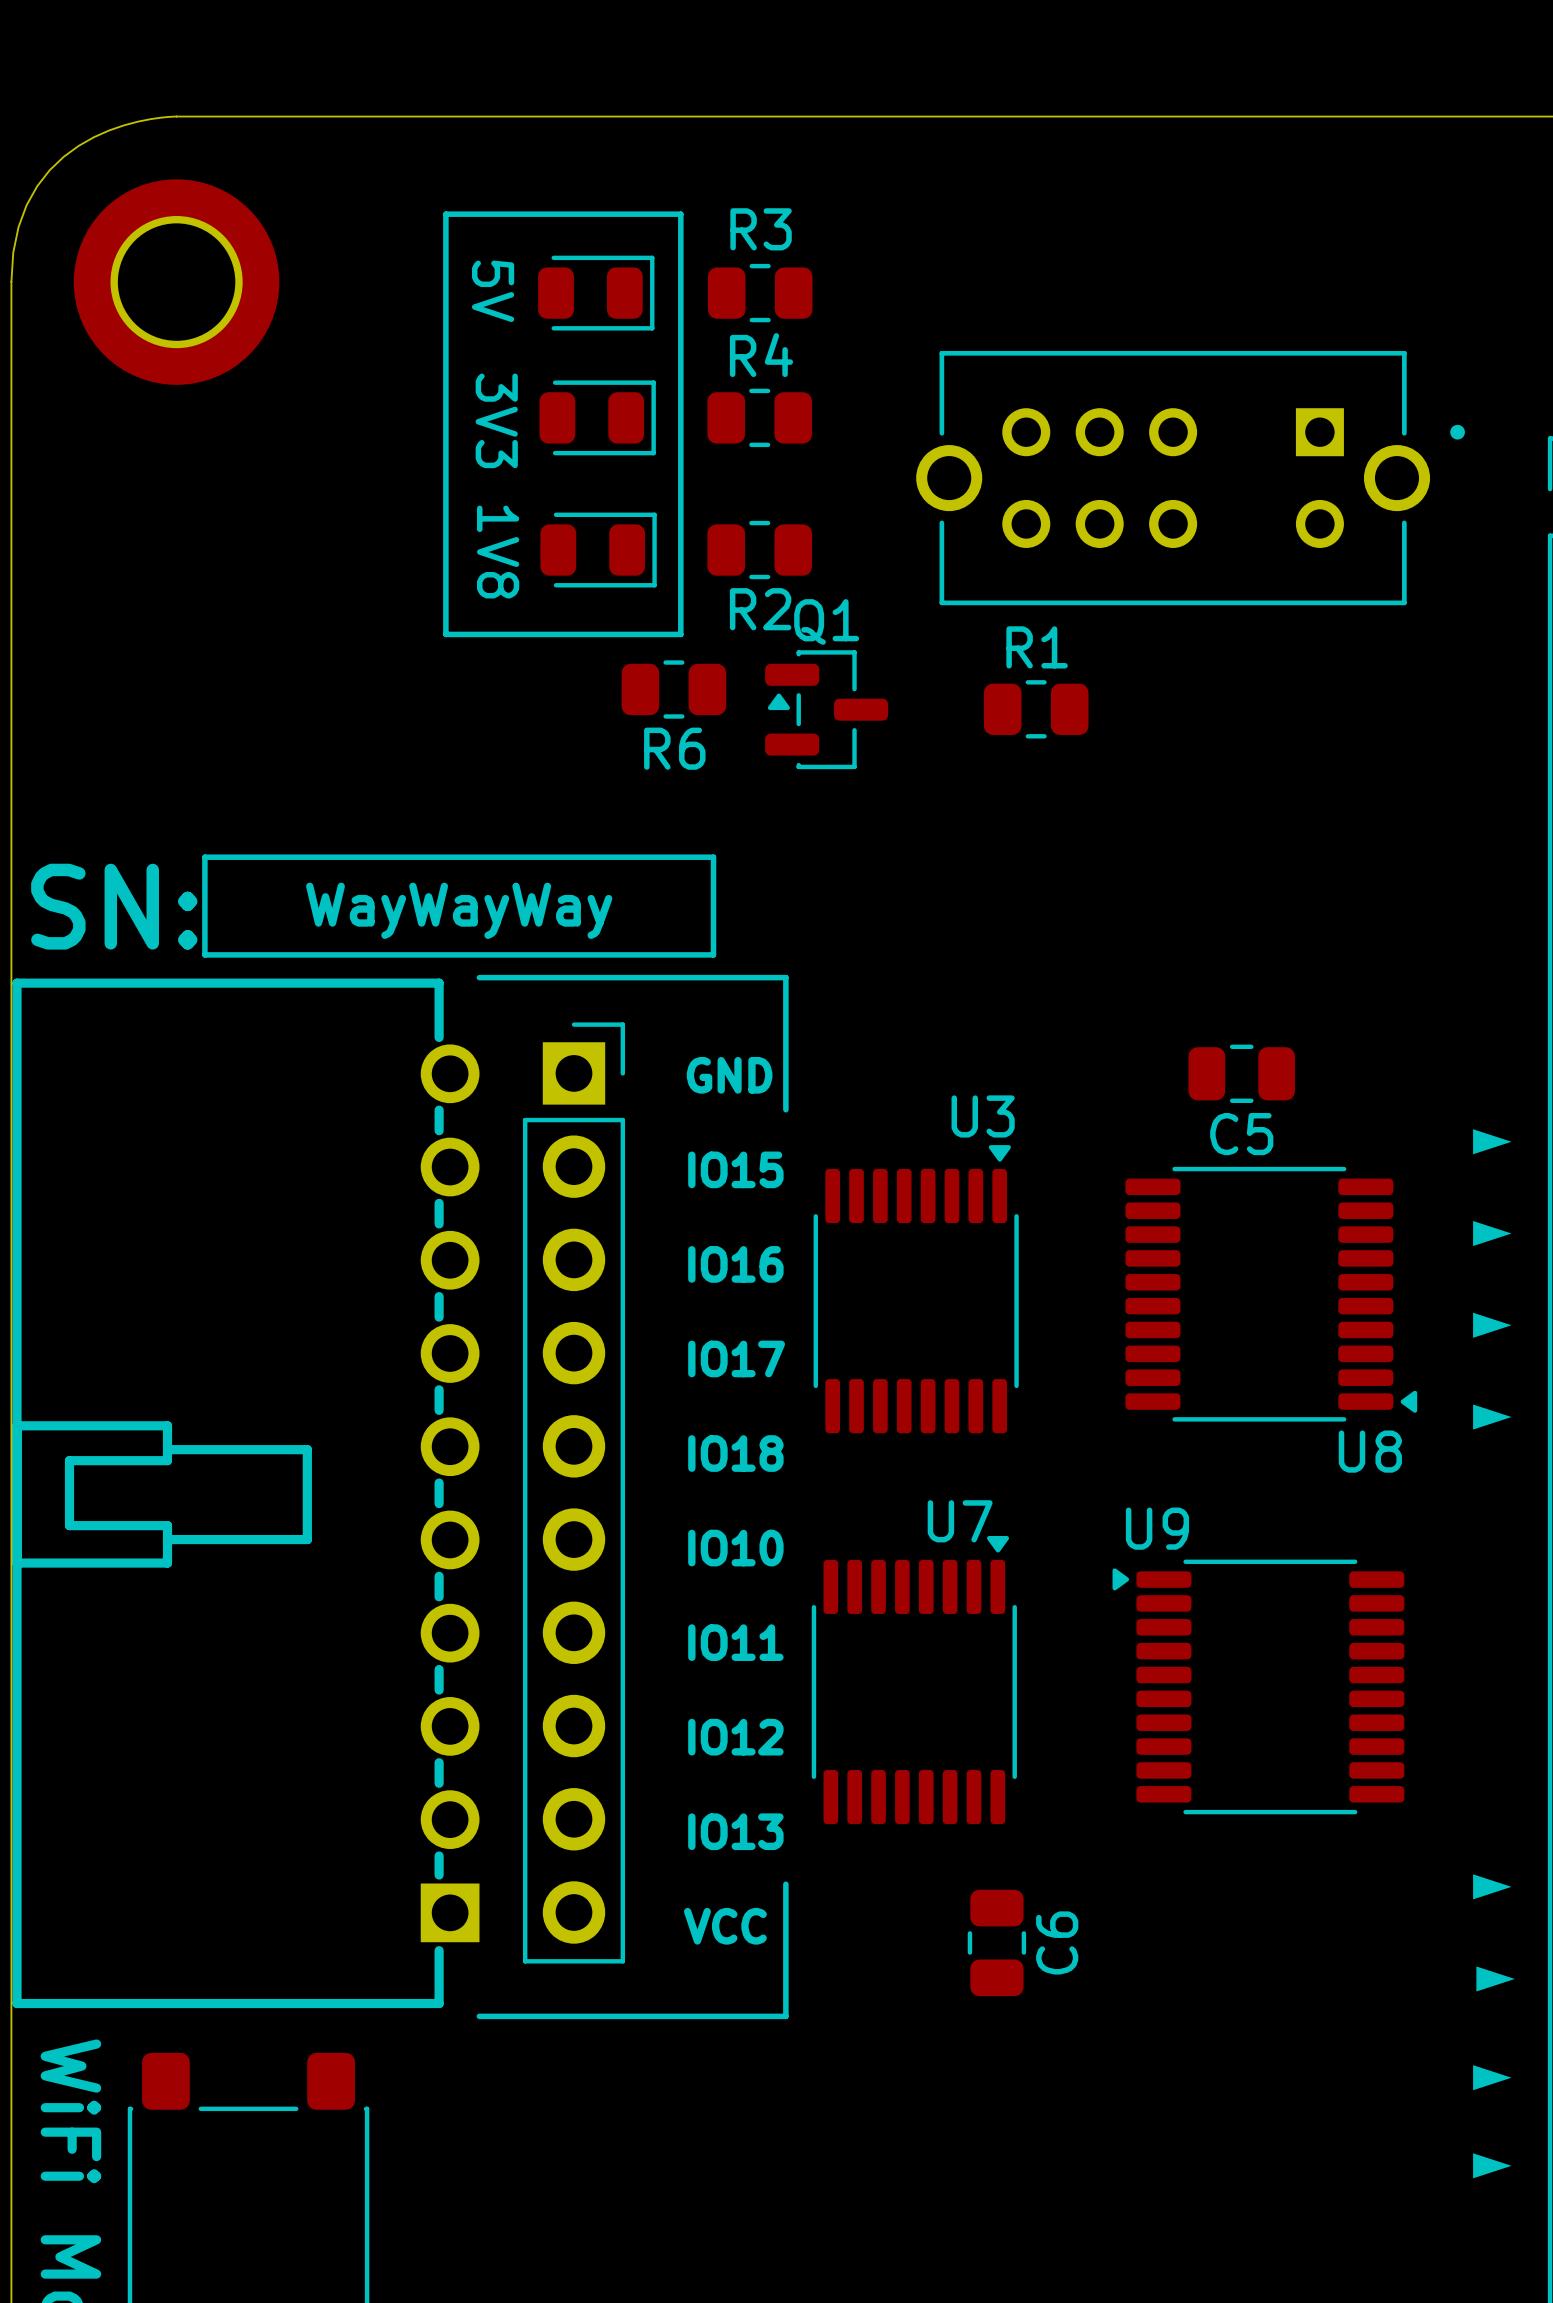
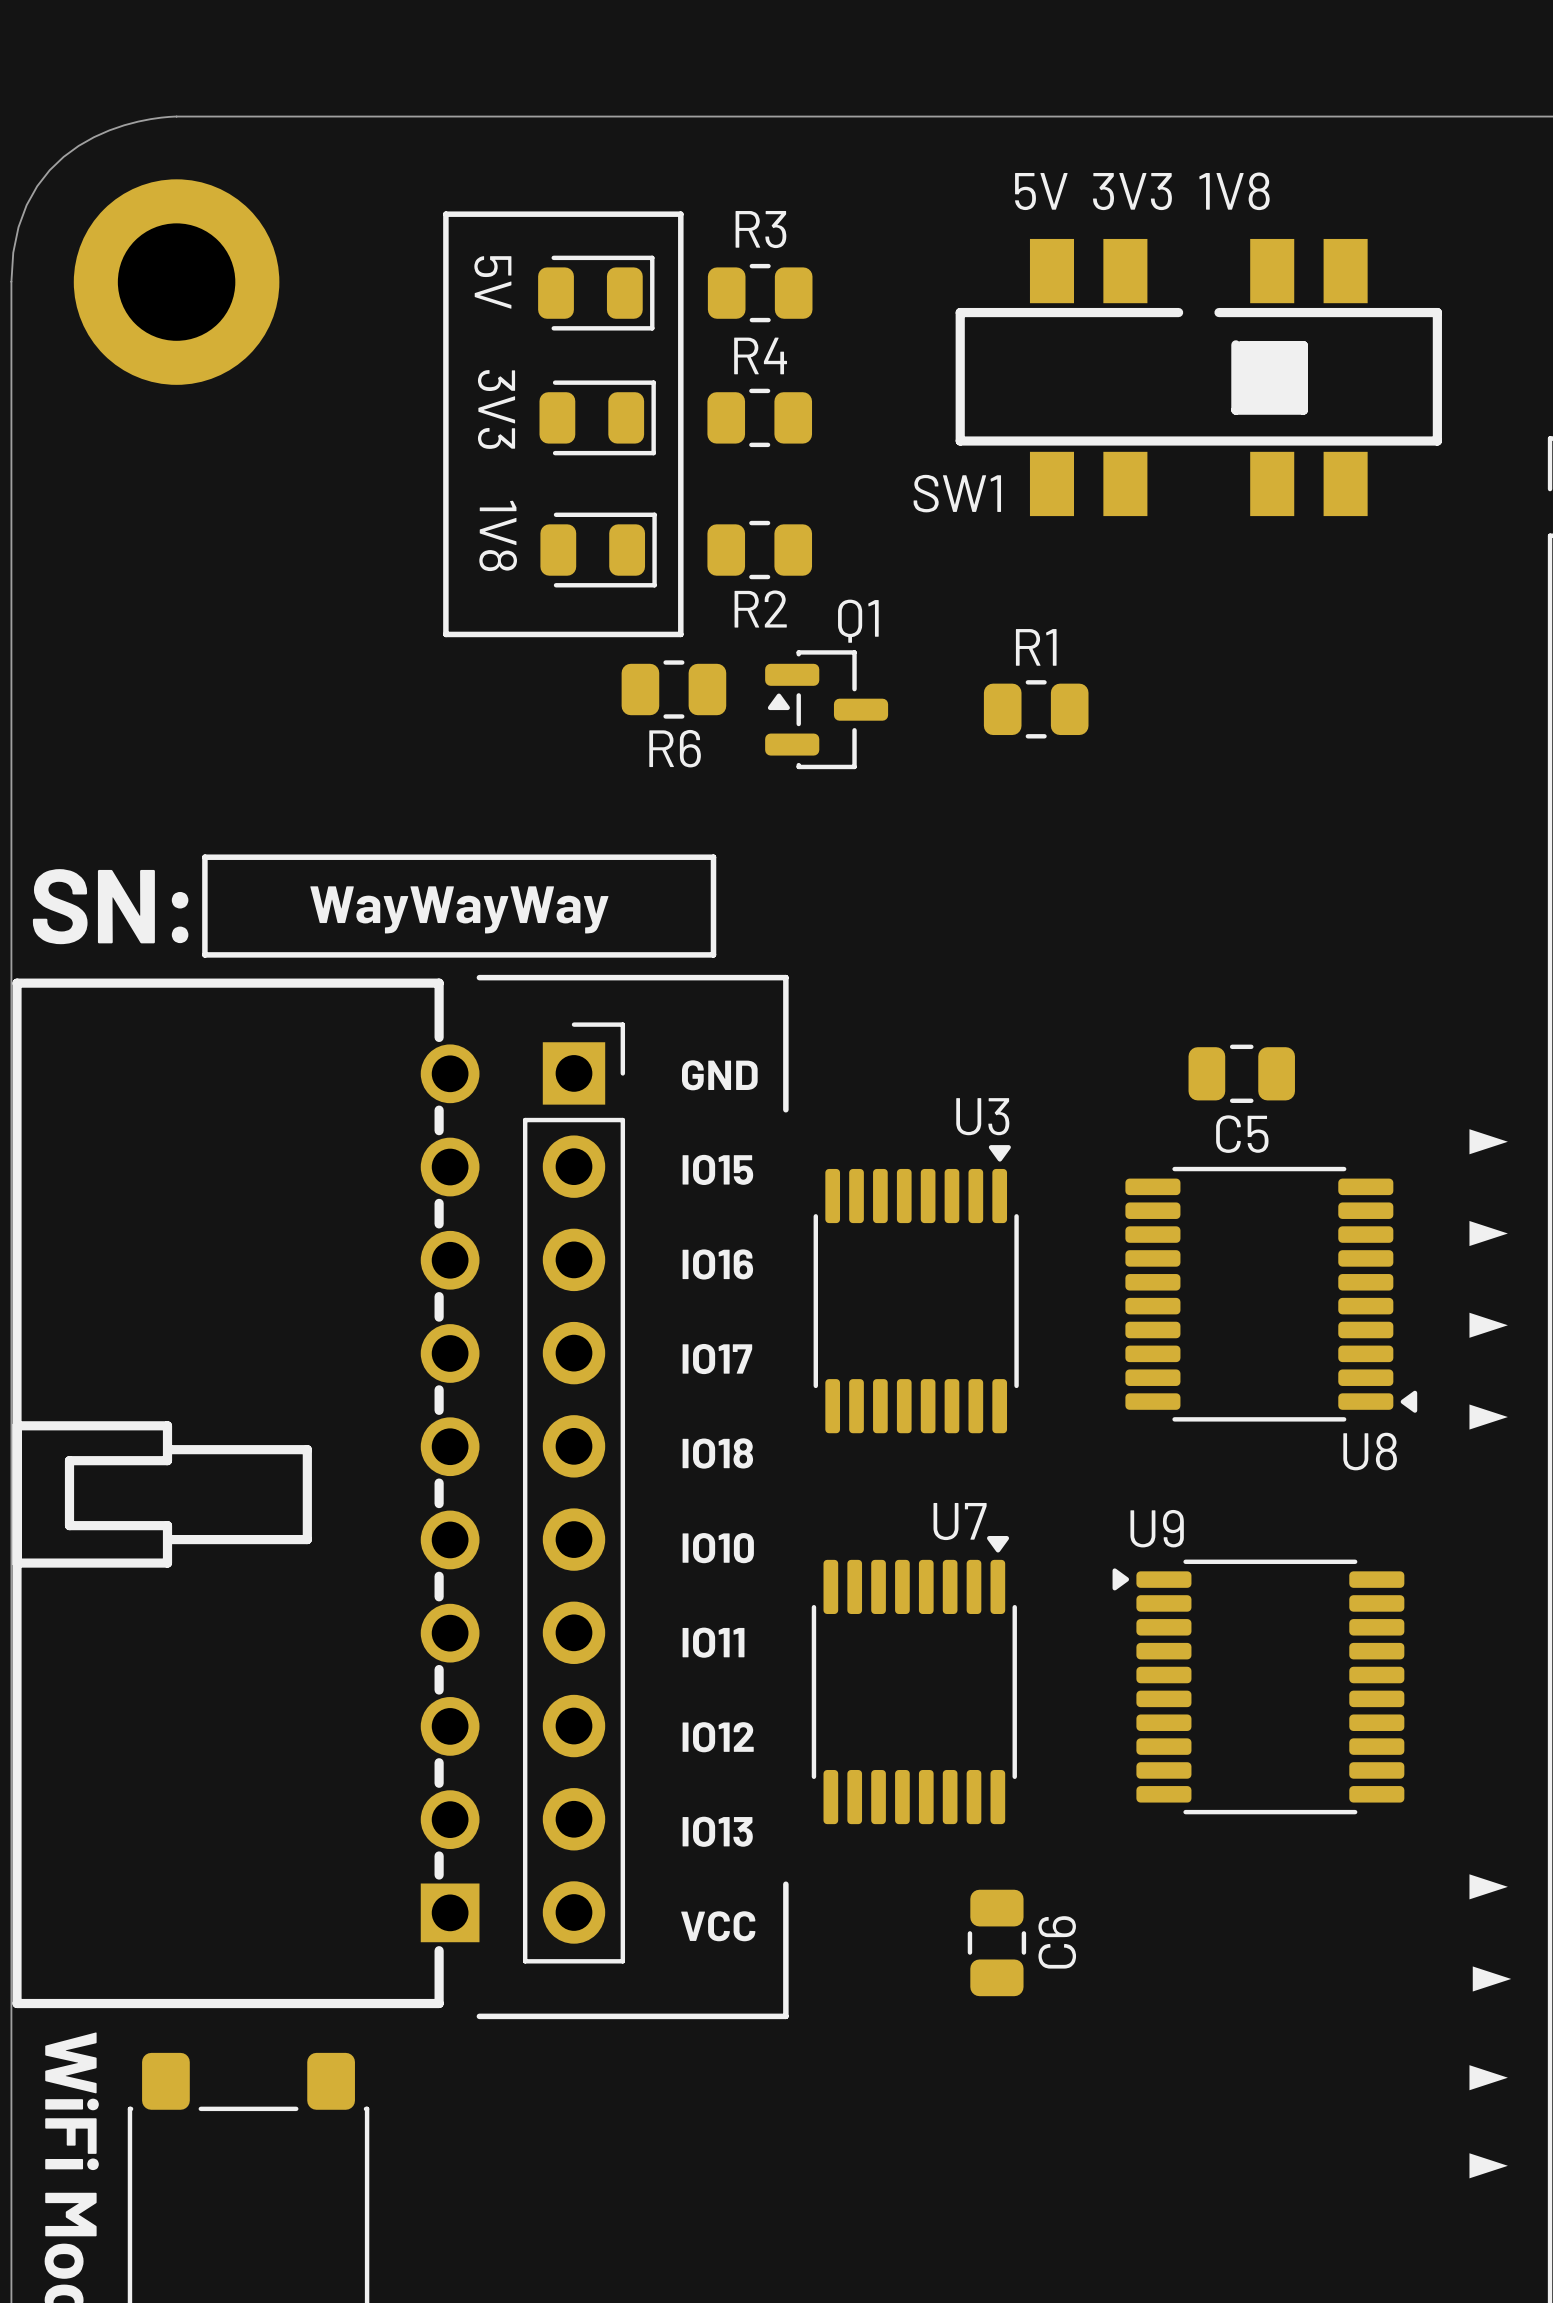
text: none -> 5V 3V3 1V8 (1142, 191)
SW1: none -> (1198, 377)
part: (1190, 478) -> none
Q1 name position: Q1 (826, 621) -> Q1 (858, 621)

